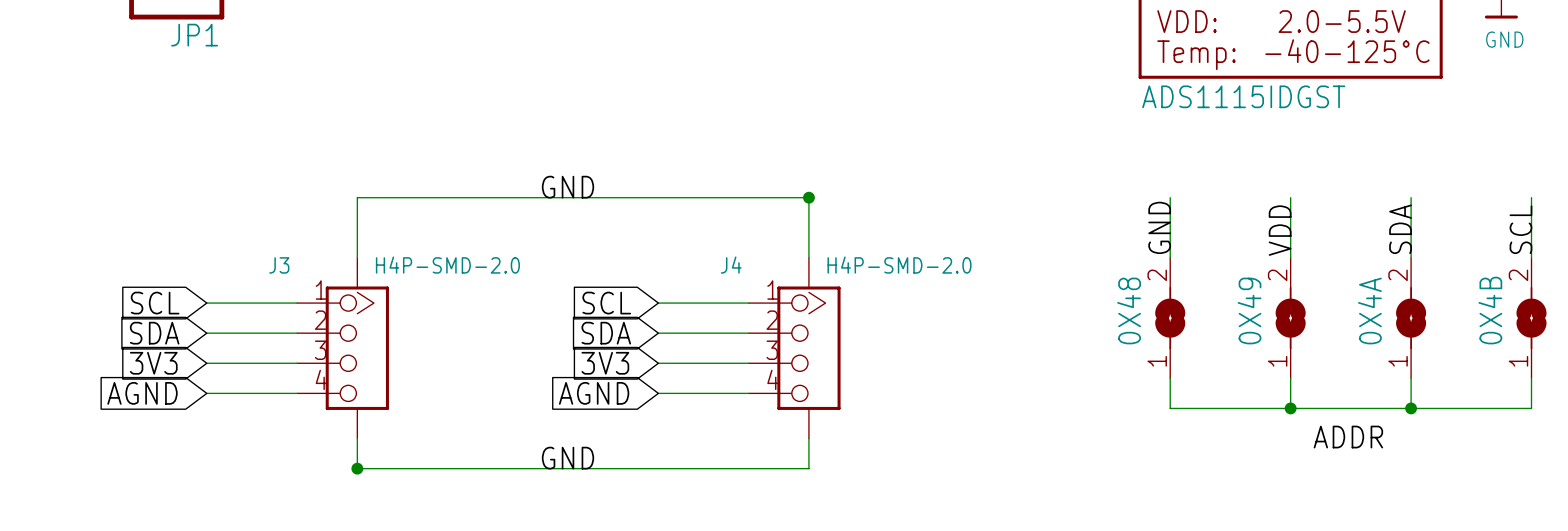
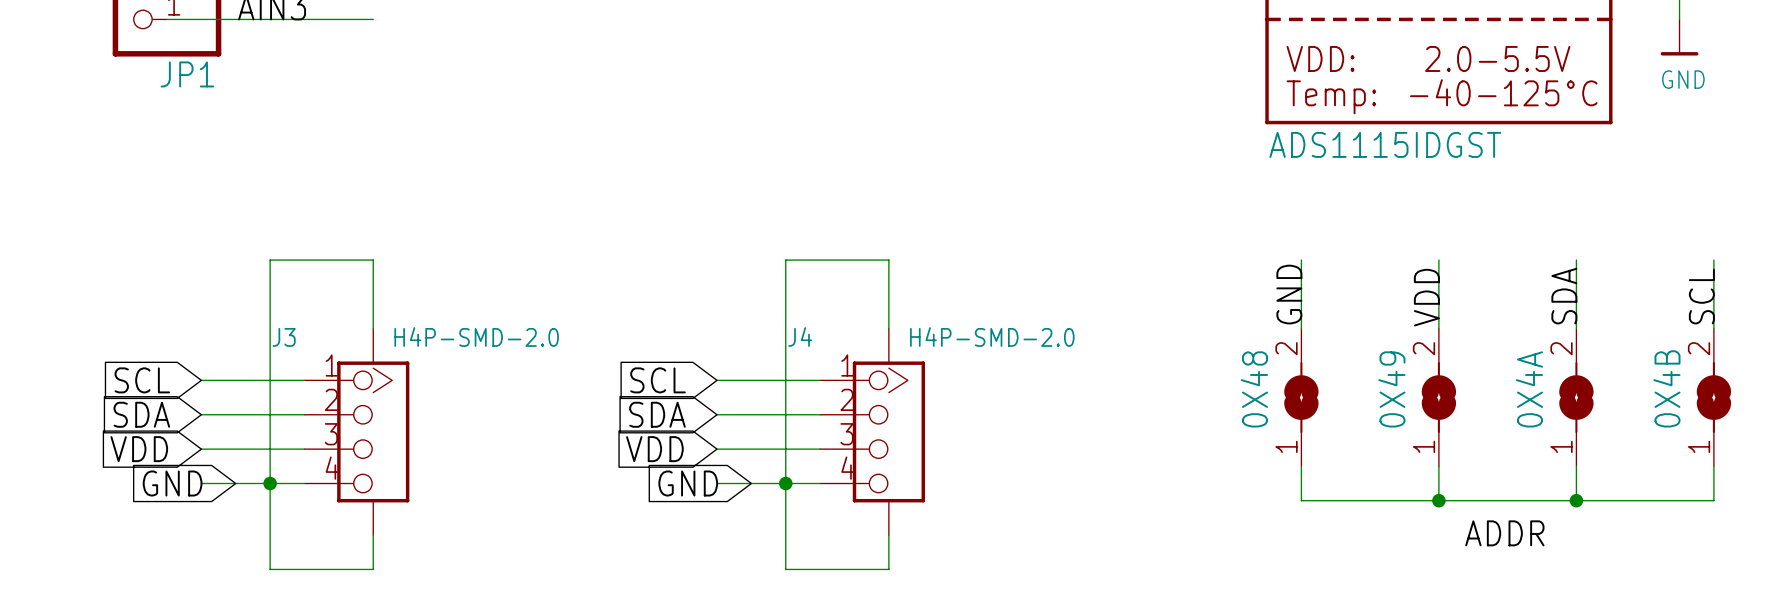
label: GND (567, 187) -> none
wire: (357, 197) (718, 197) -> (373, 260) (270, 260) (270, 569) (373, 569)
junction: (808, 197) -> none
global label: 3V3 (153, 363) -> VDD (139, 449)
global label: 3V3 (605, 363) -> VDD (654, 449)
global label: AGND (142, 393) -> GND (172, 483)
junction: none -> (270, 483)
global label: AGND (594, 393) -> GND (688, 483)
junction: none -> (785, 483)
label: GND (567, 458) -> none
wire: (357, 468) (718, 468) -> (785, 260) (785, 569)
junction: (357, 468) -> none

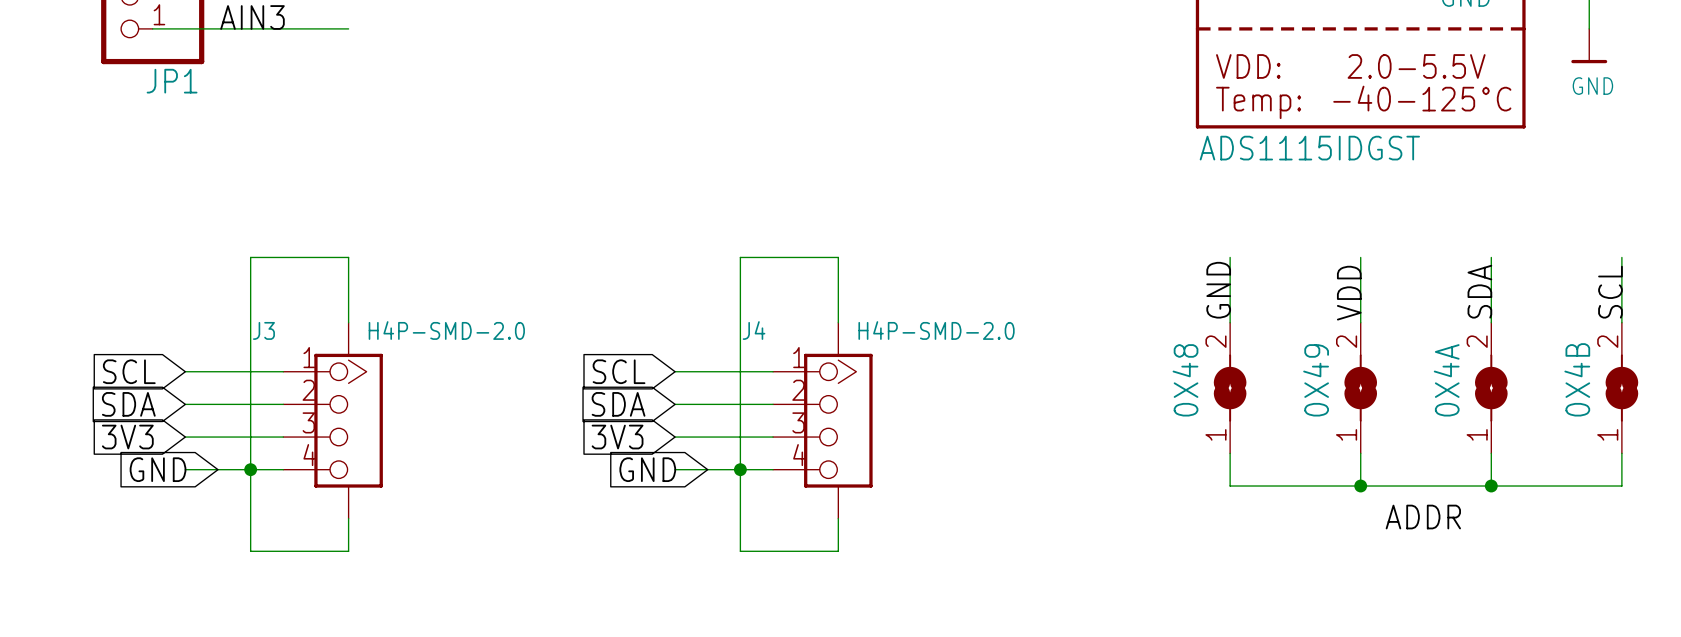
global label: VDD (139, 449) -> 3V3 (127, 437)
global label: VDD (654, 449) -> 3V3 (617, 437)

